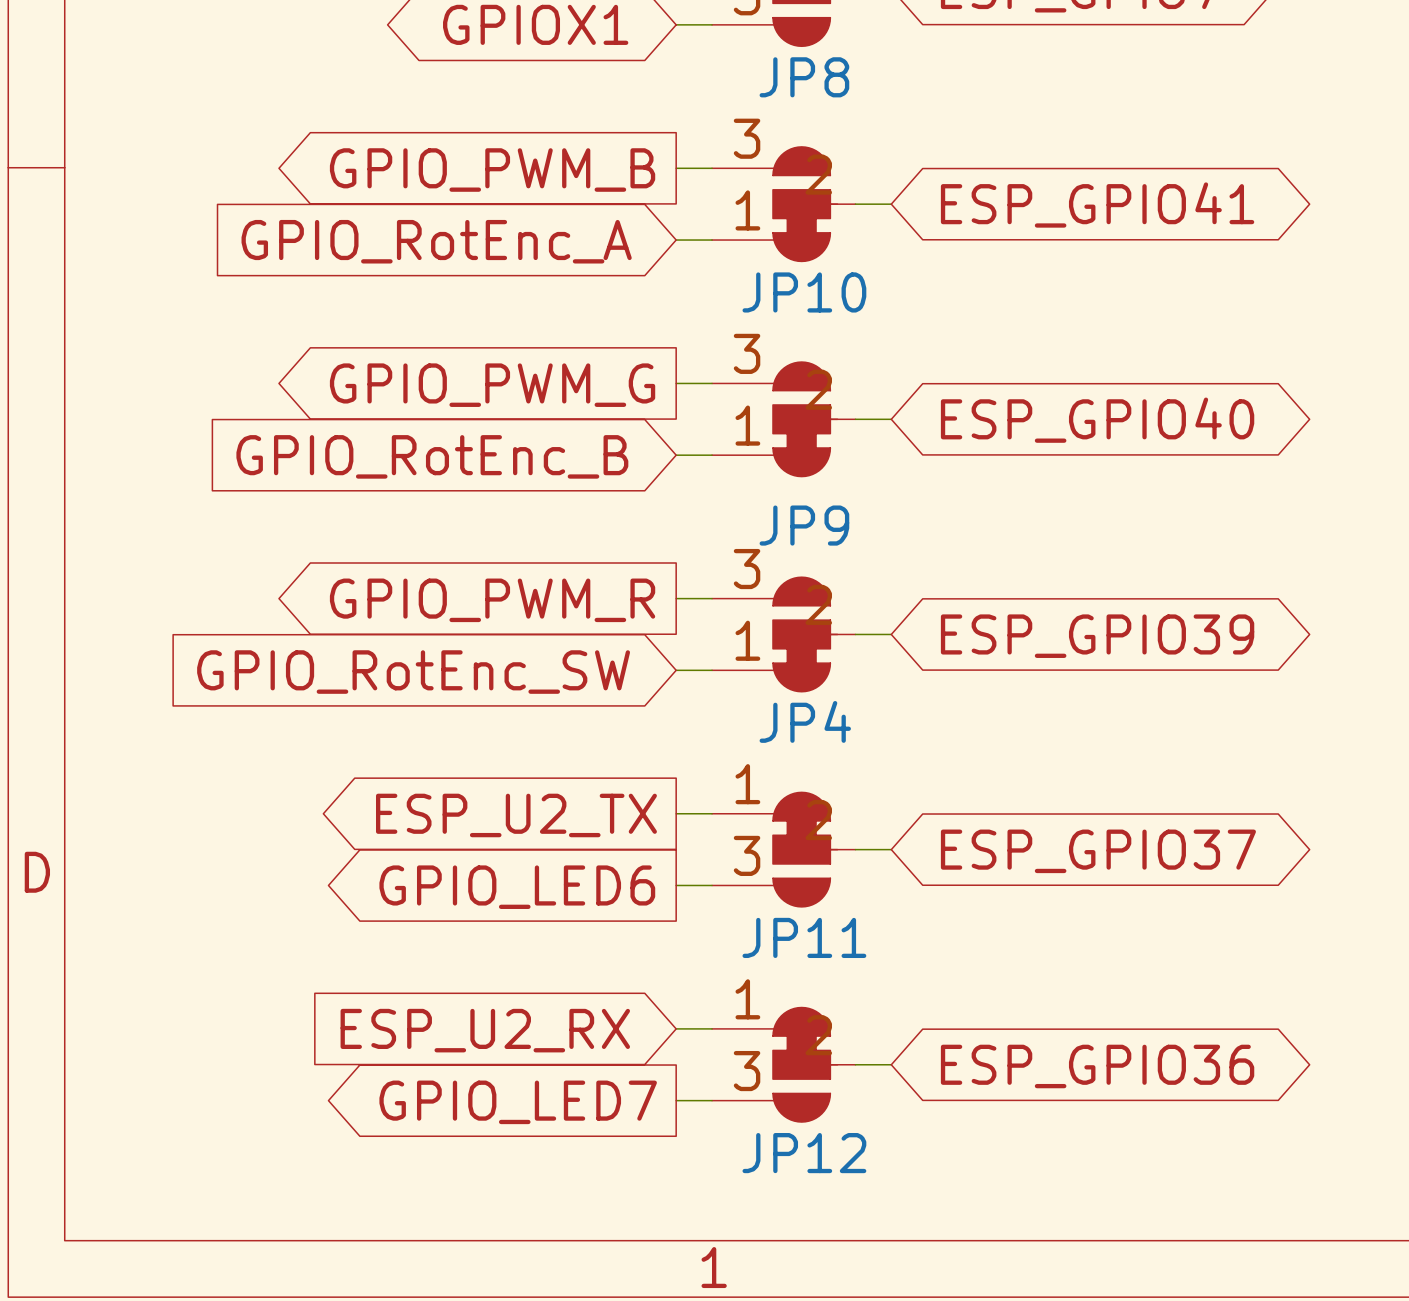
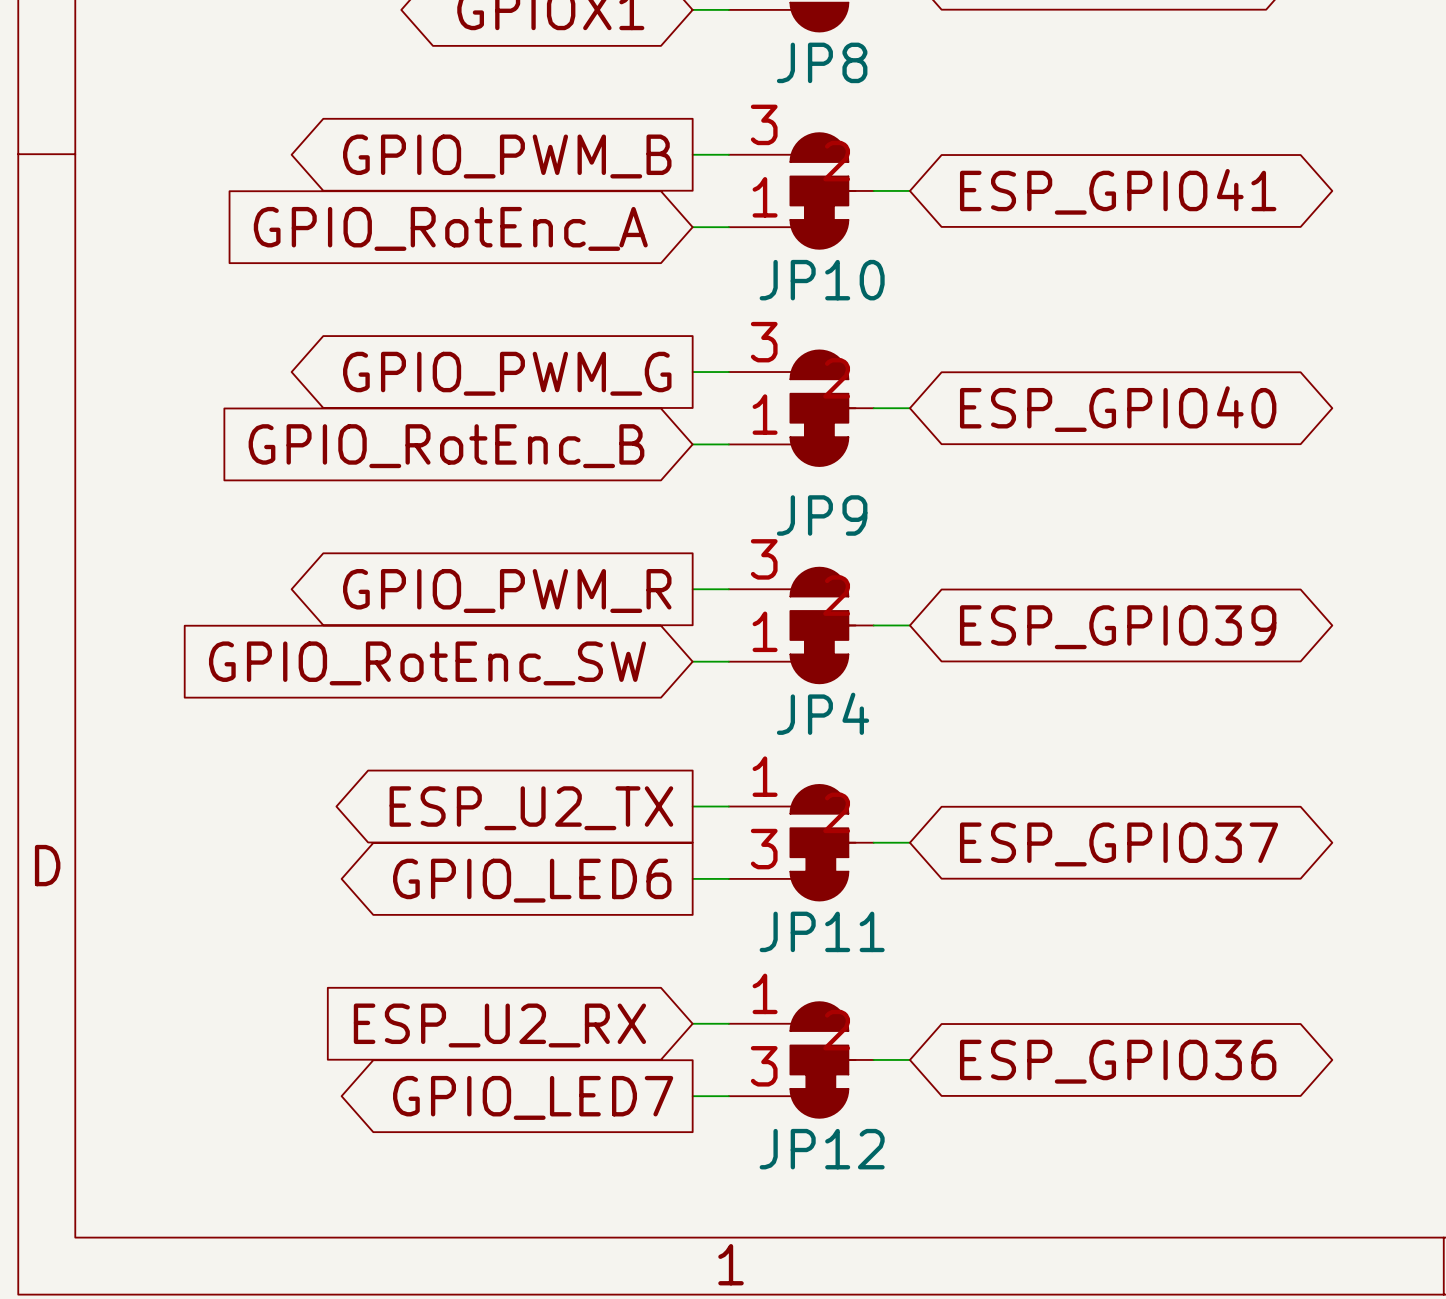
JP11 symbol: [712, 792, 856, 907] -> [728, 784, 874, 901]
JP12 symbol: [712, 1007, 856, 1123] -> [728, 1002, 874, 1118]

